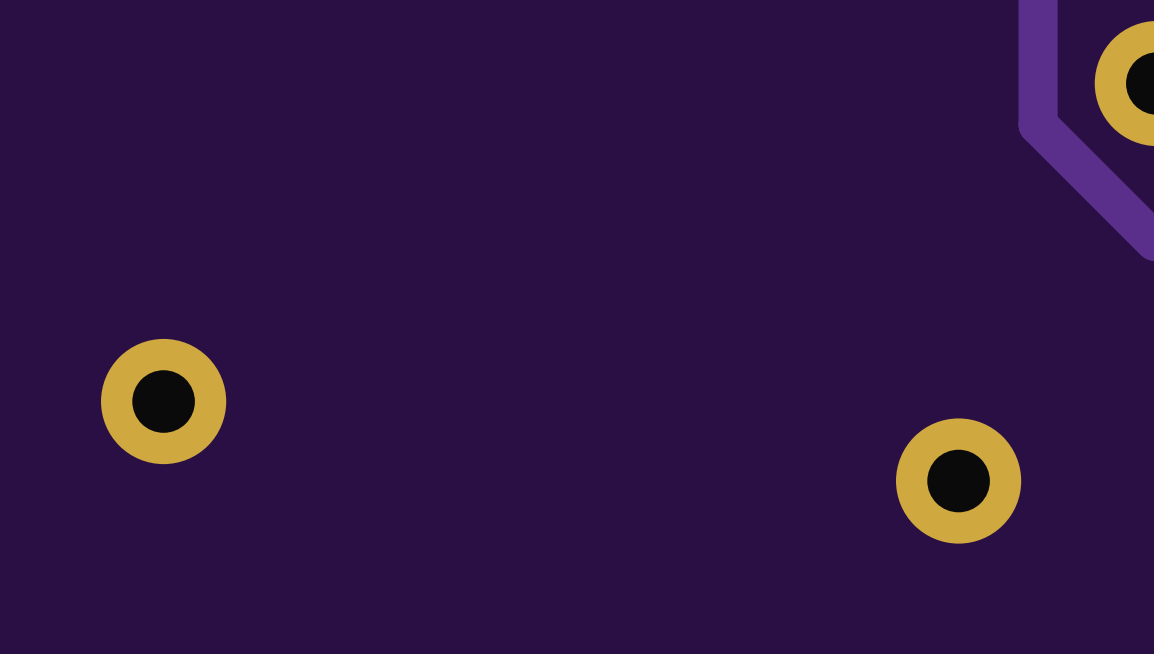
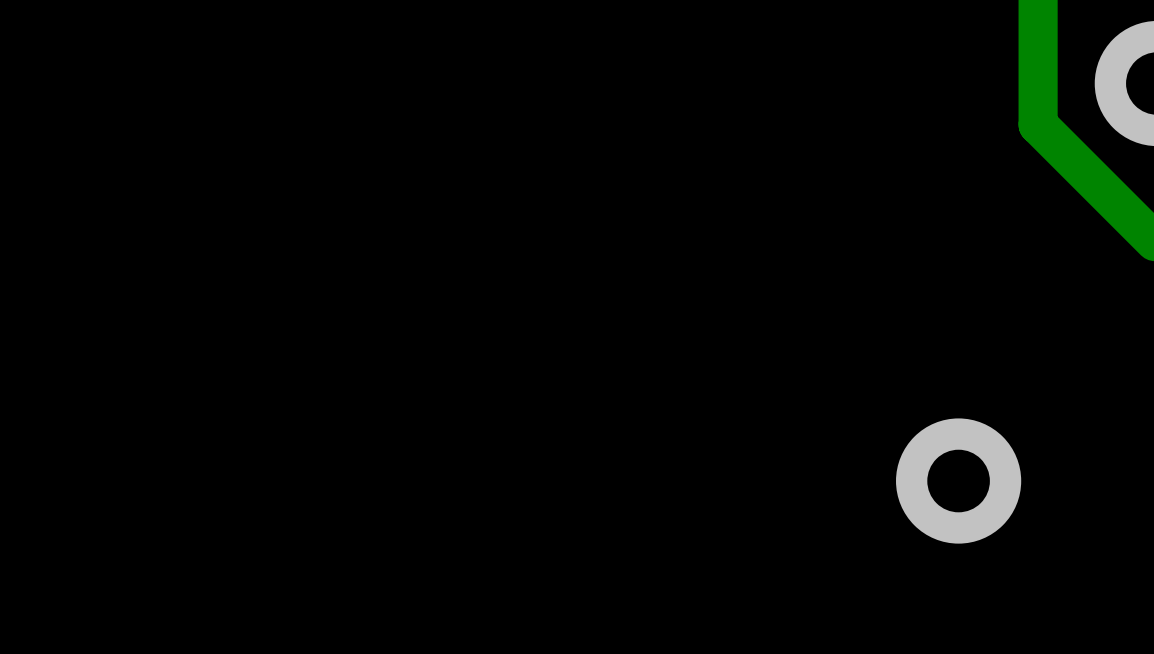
via: (163, 401) -> none

